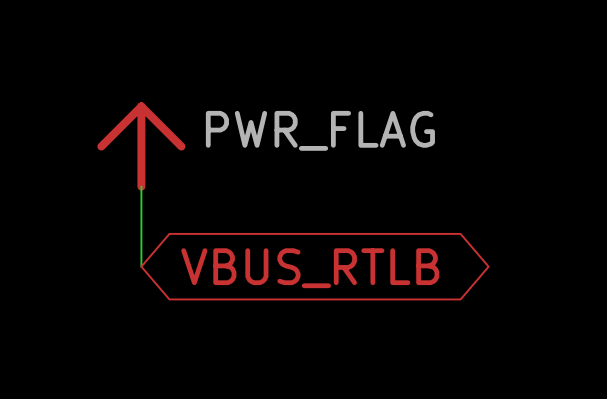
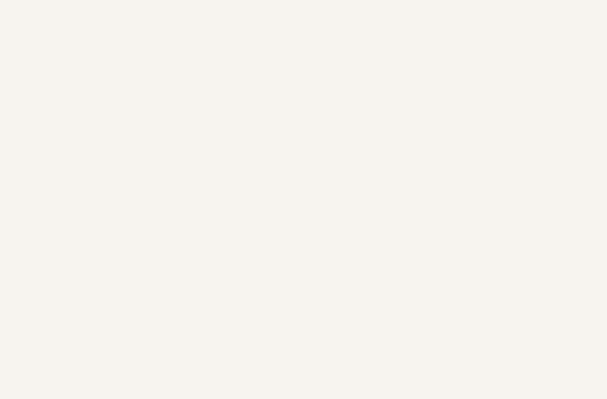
power symbol: PWR_FLAG (141, 146) -> none
wire: (141, 186) (141, 266) -> none
global label: VBUS_RTLB (310, 268) -> none

